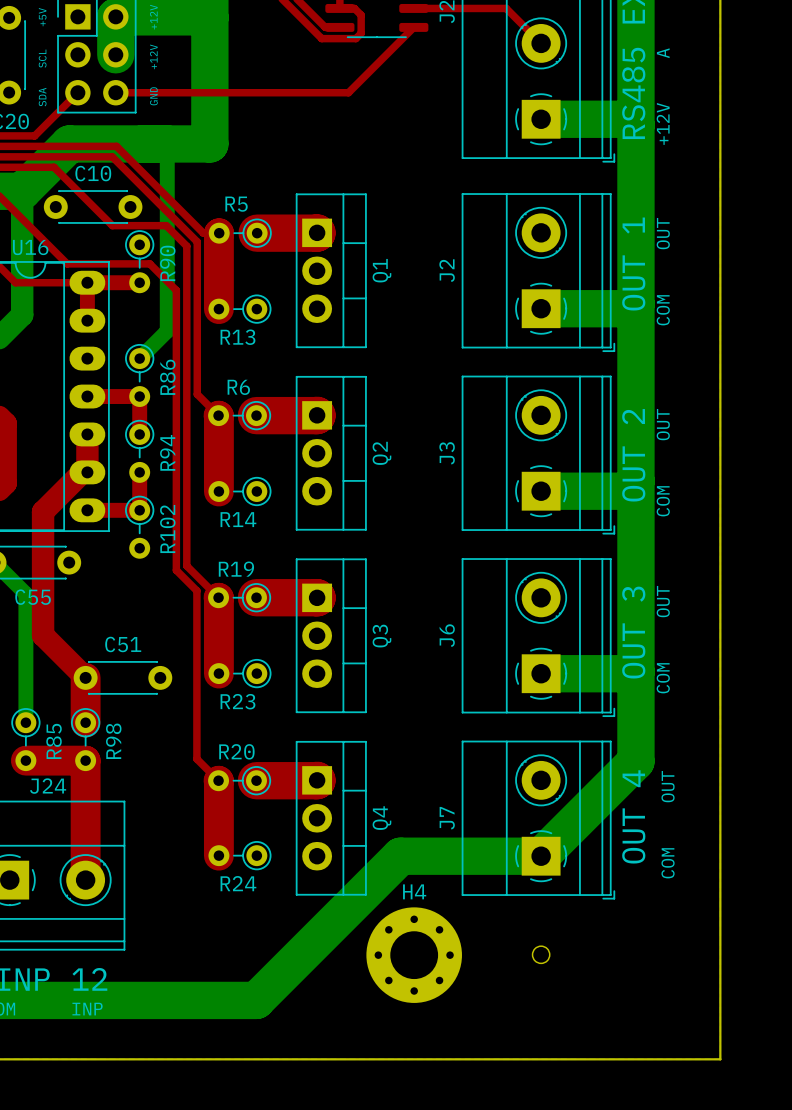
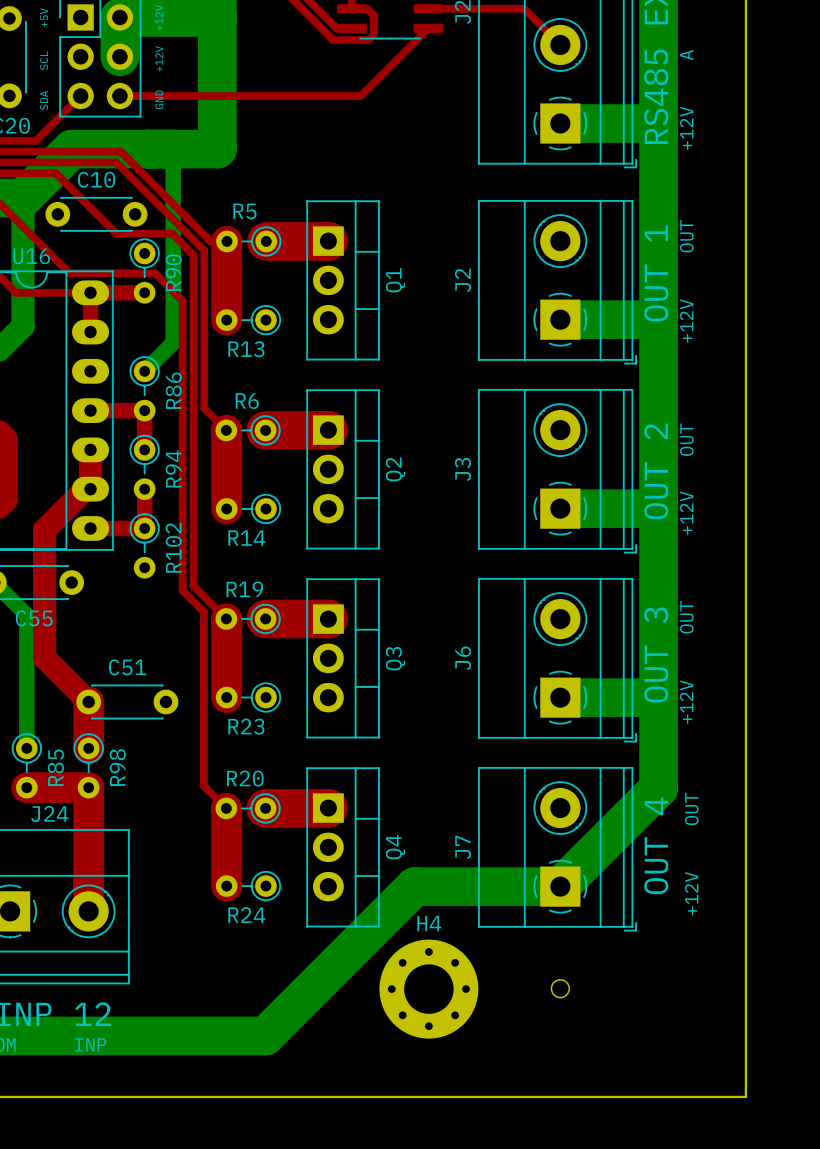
text: COM OUT (663, 271) -> +12V OUT (686, 281)
text: COM OUT (663, 462) -> +12V OUT (686, 479)
text: COM OUT (663, 639) -> +12V OUT (686, 662)
text: COM OUT (668, 824) -> +12V OUT (691, 854)

